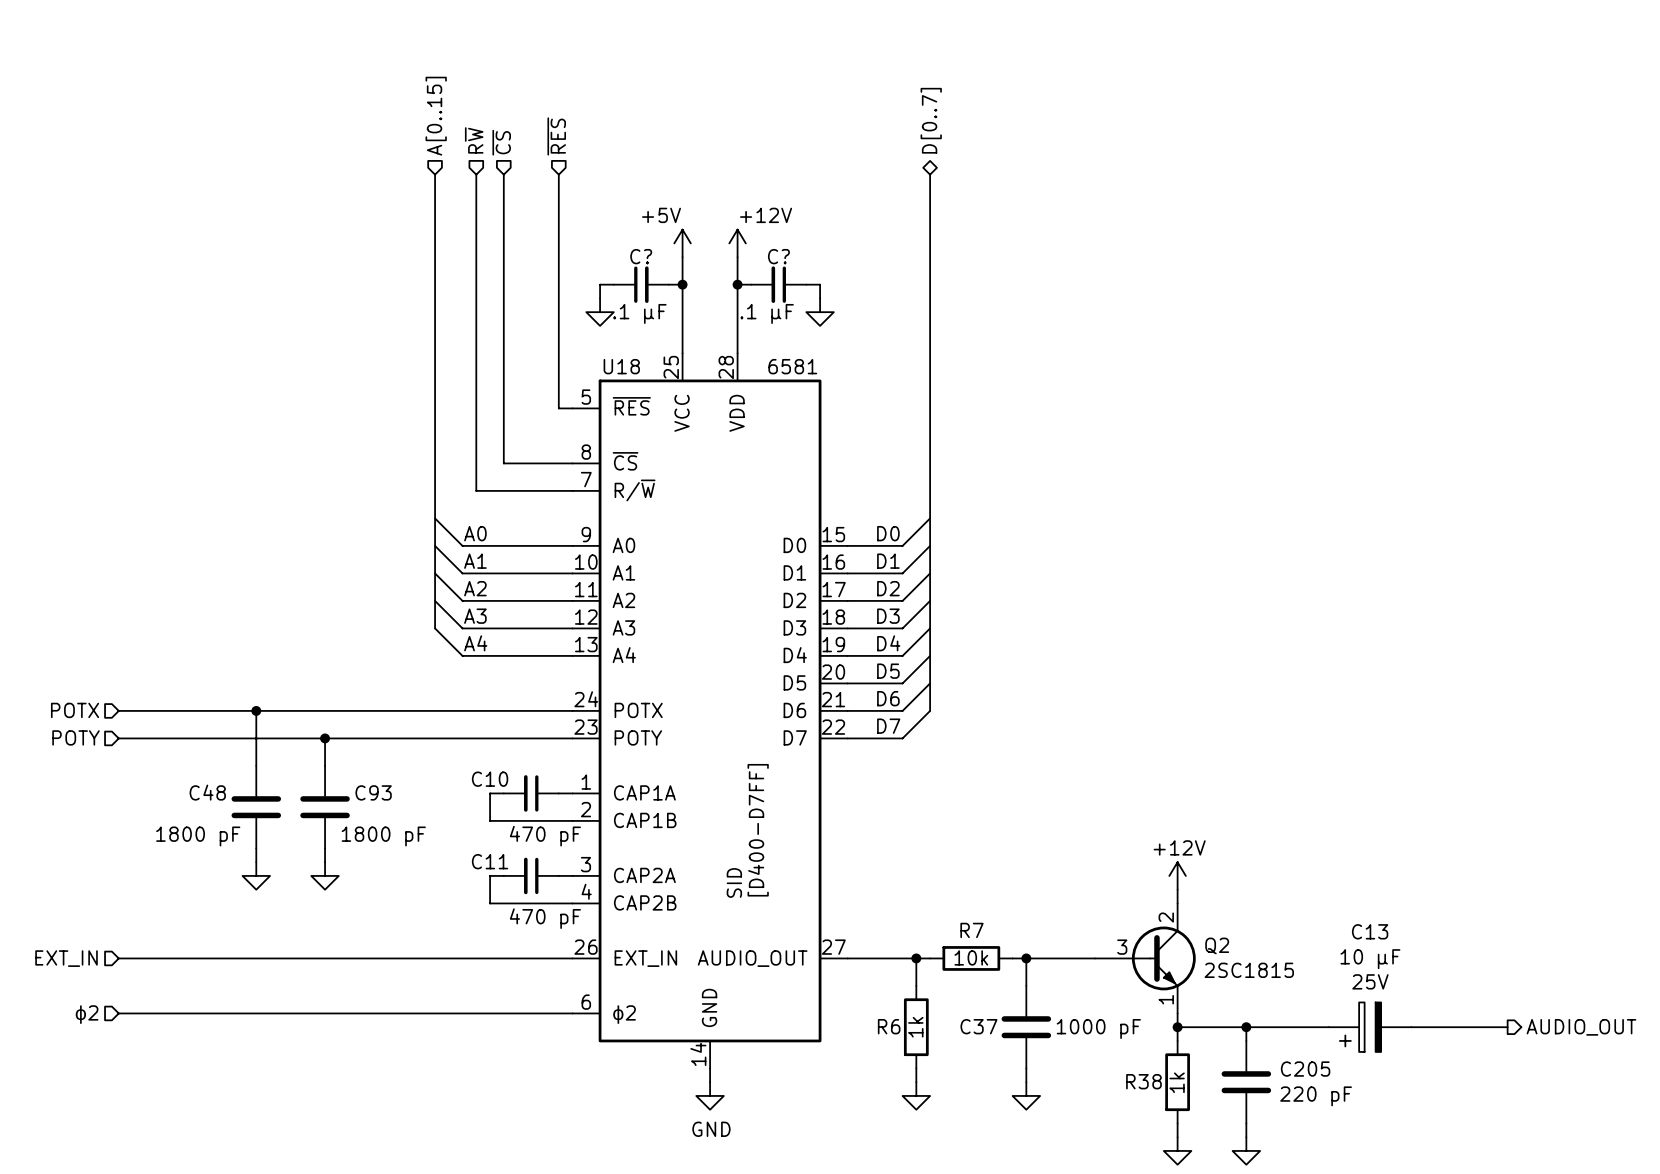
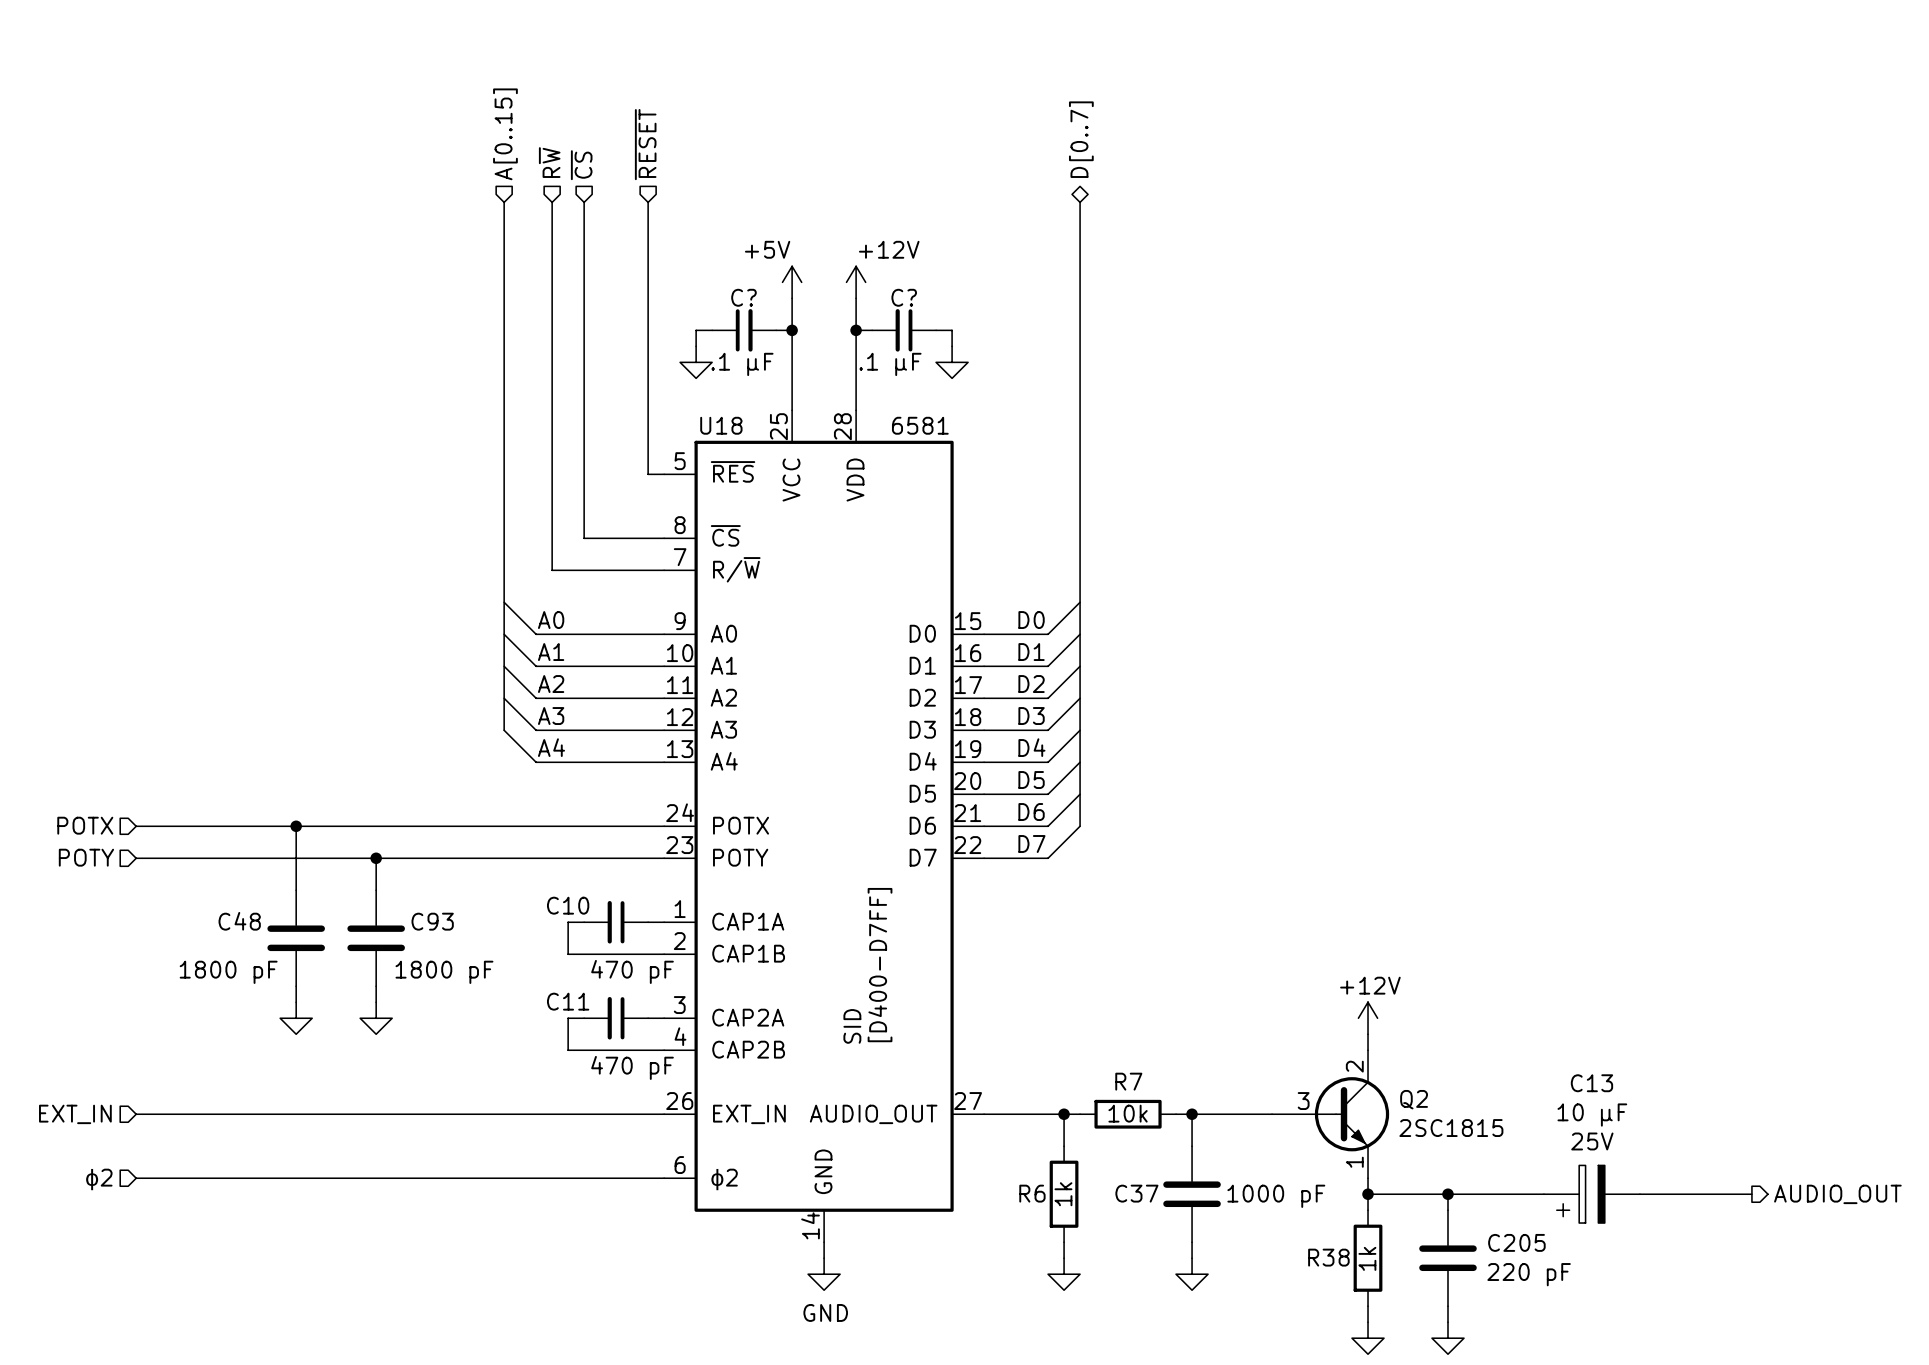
hierarchical label: ~{RES} (556, 136) -> ~{RESET} (645, 144)

